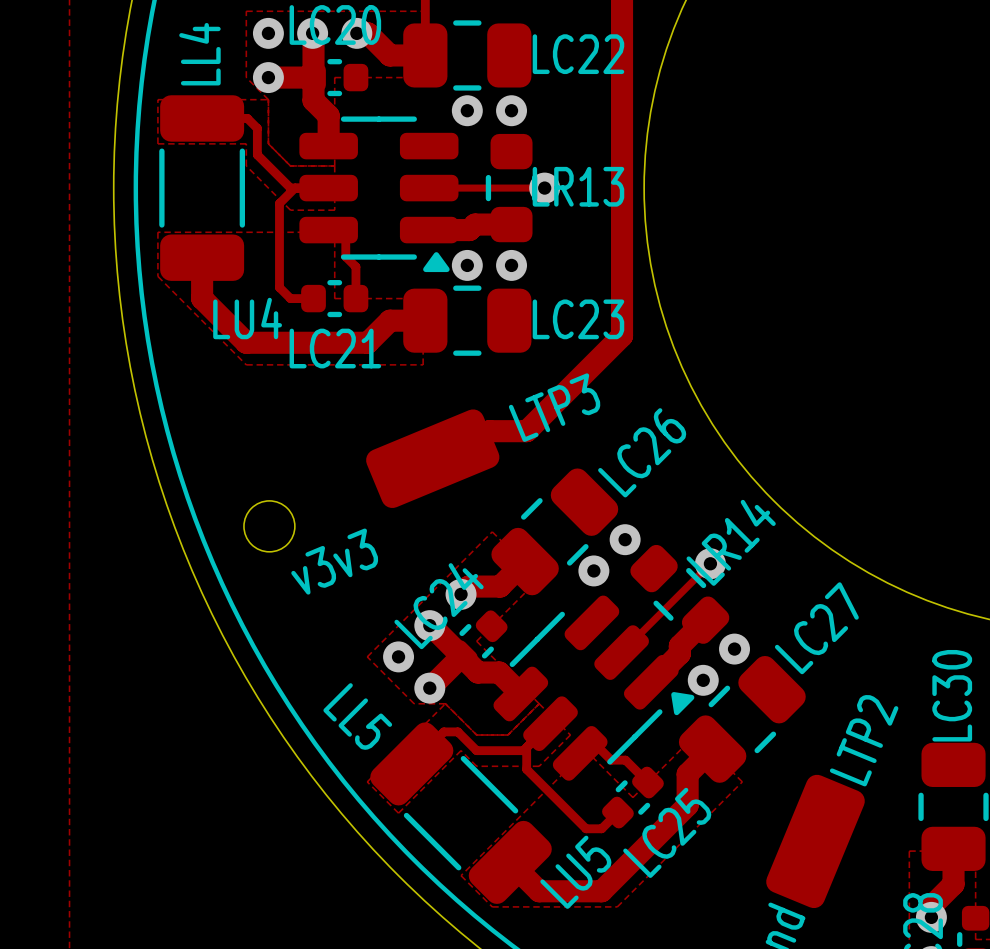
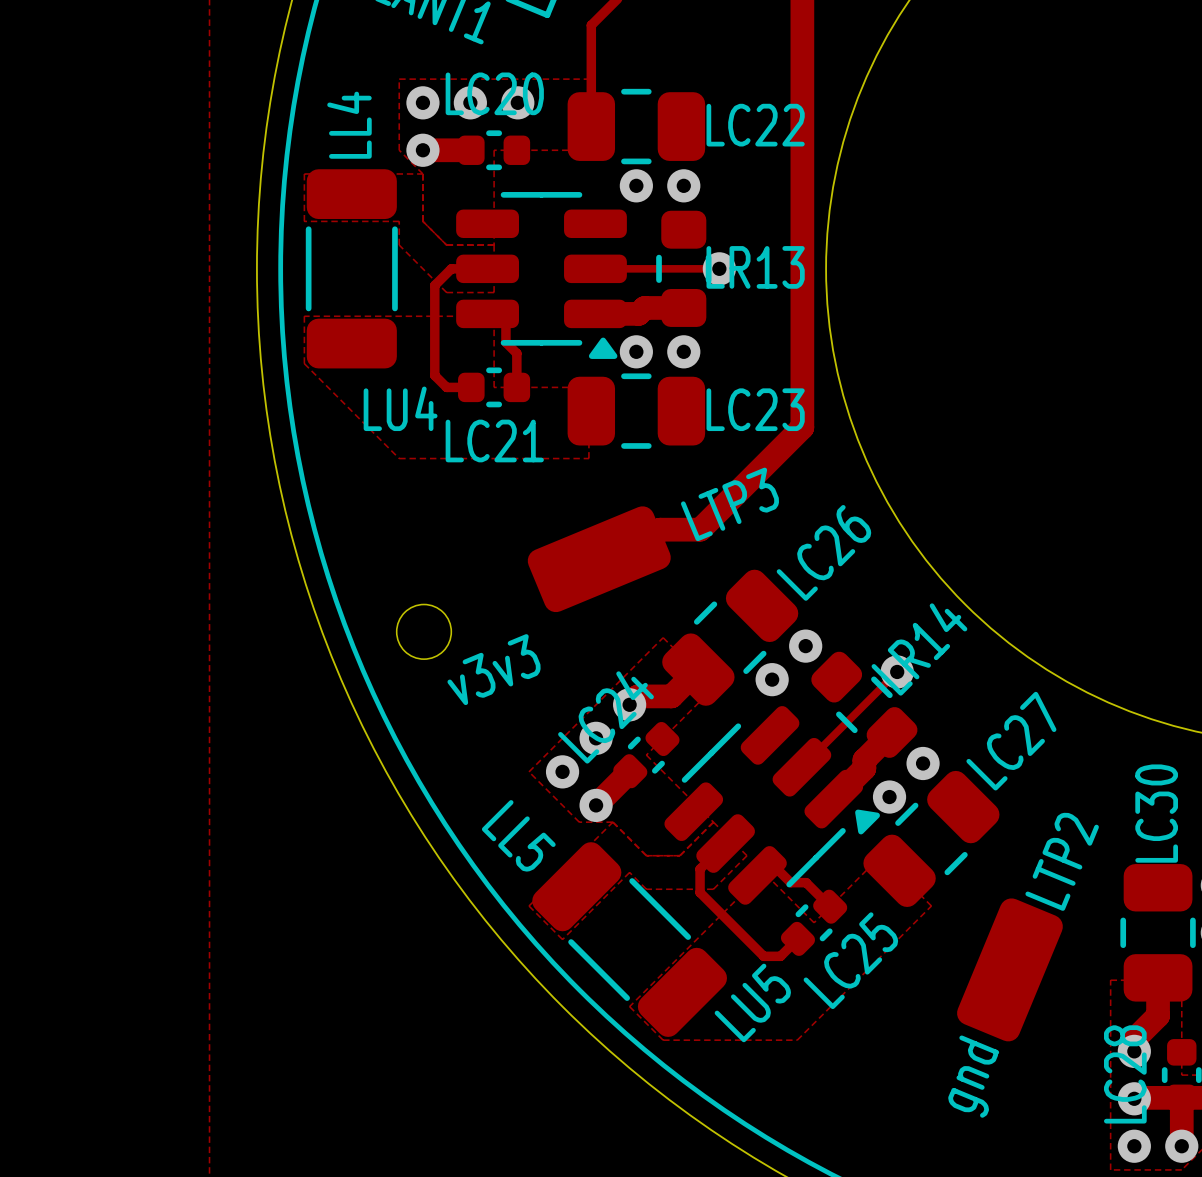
track: (312, 33) (313, 100) (328, 115) (328, 146) -> none
track: (356, 33) (367, 33) (389, 55) (425, 55) -> none
track: (202, 118) (247, 118) (257, 128) (257, 154) (290, 188) (294, 188) -> none
track: (202, 257) (202, 298) (246, 342) (367, 342) (389, 320) (425, 320) -> none
track: (429, 625) (477, 672) (499, 672) (520, 694) -> none
track: (526, 747) (523, 750) (476, 750) (457, 731) (443, 731) (411, 763) -> none
track: (712, 749) (687, 774) (687, 805) (601, 891) (539, 891) (510, 862) -> none

